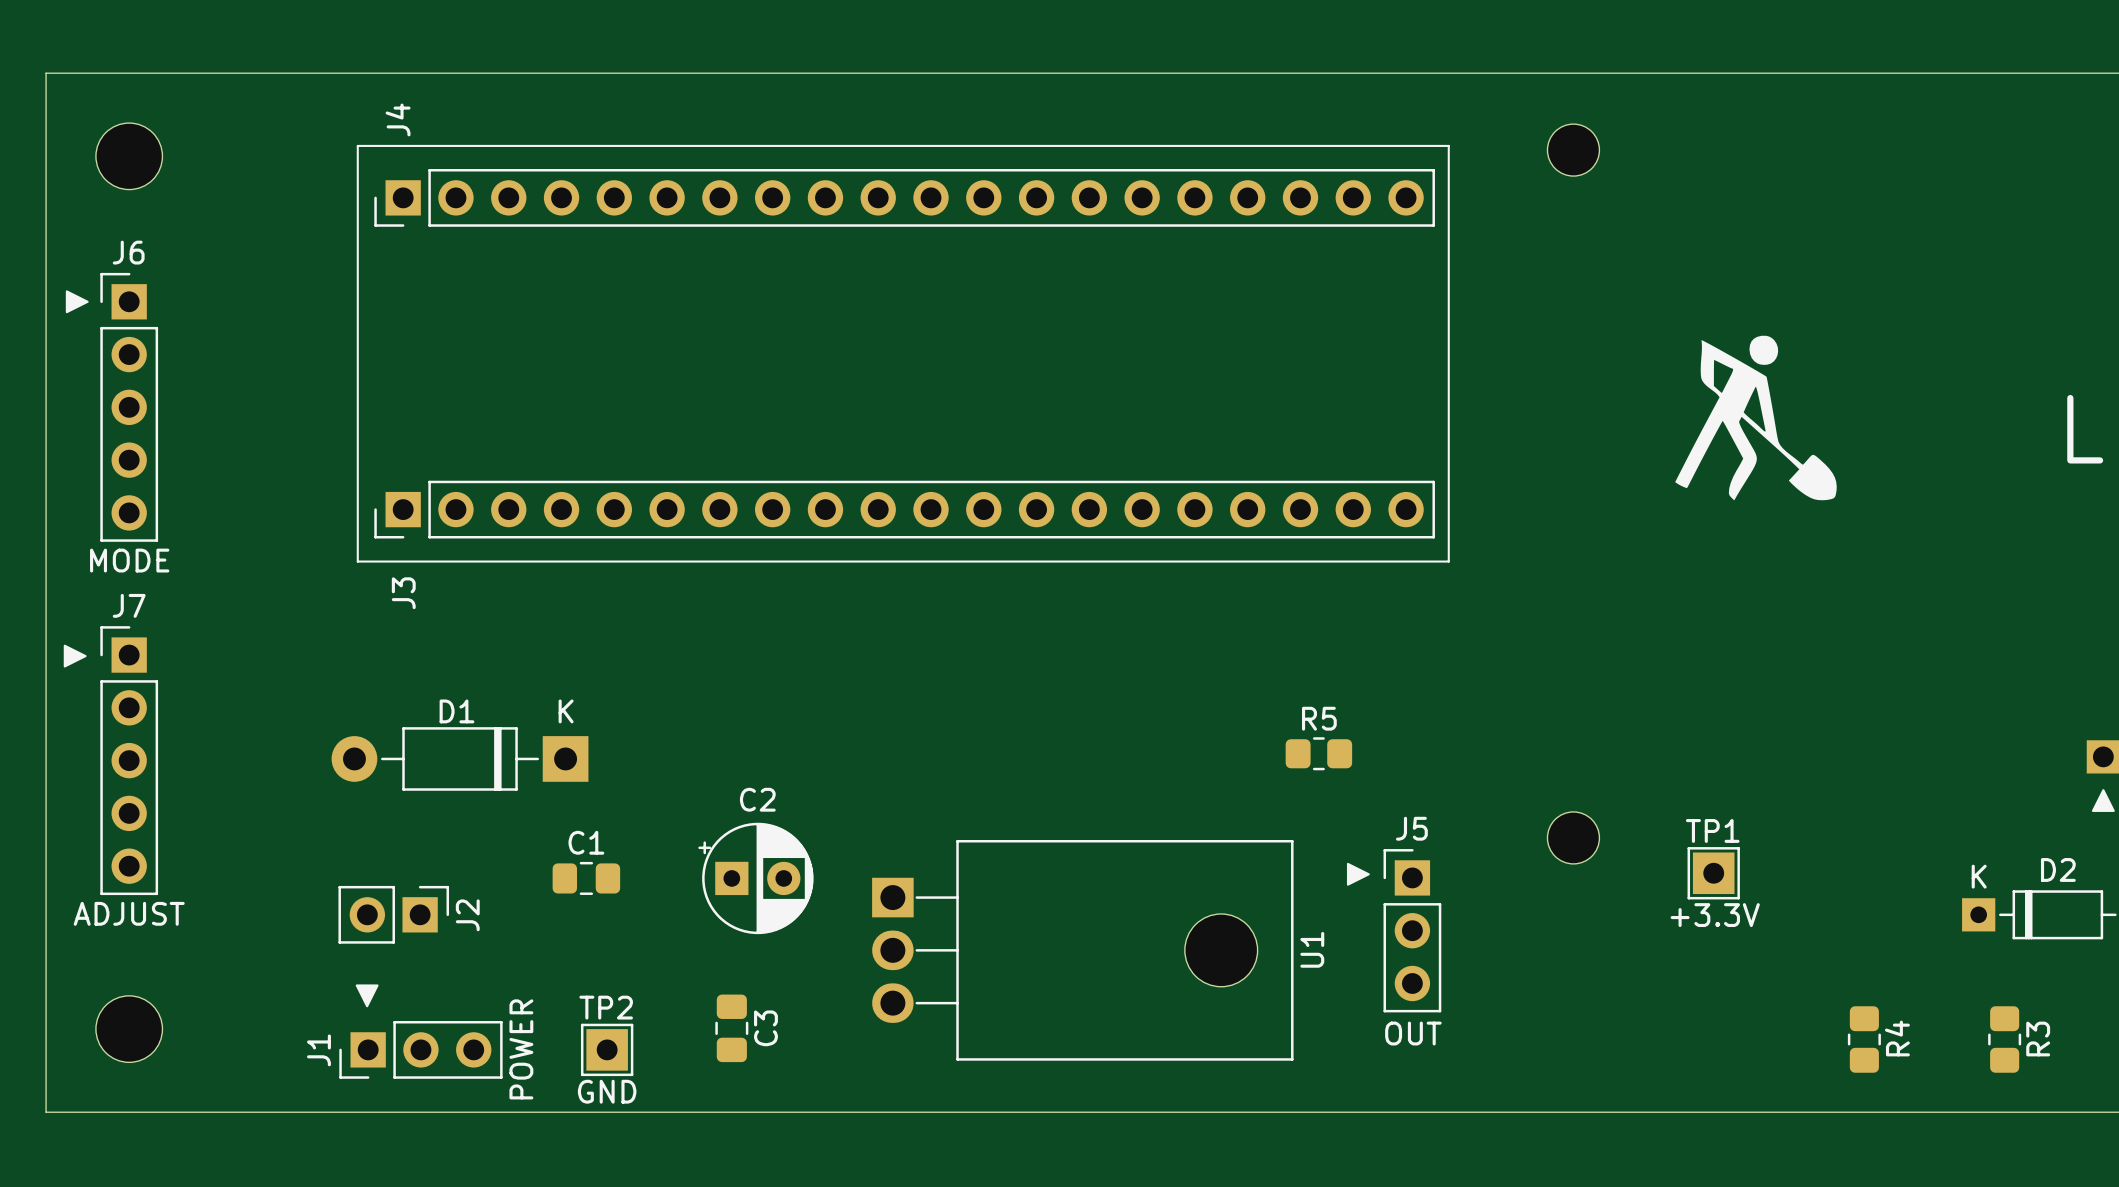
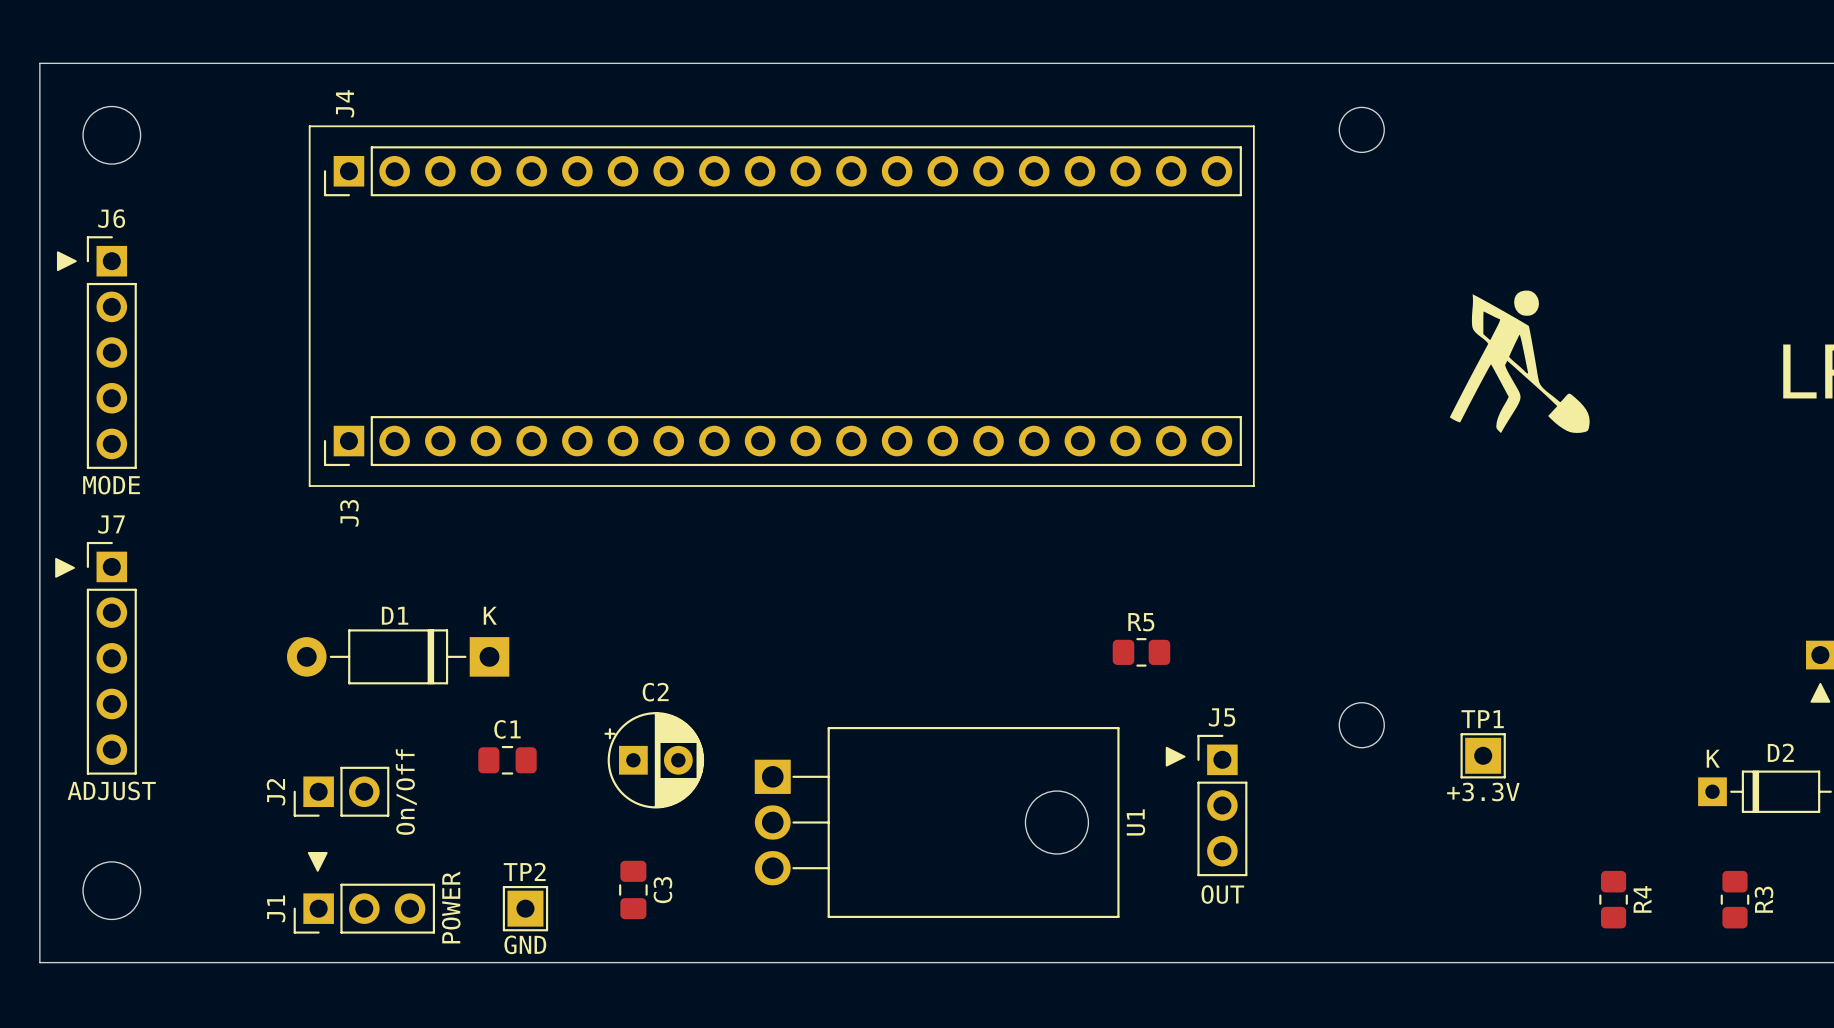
J2 value: none -> On/Off (406, 792)
J2 rotation: 0° (393, 914) -> 180° (341, 791)

